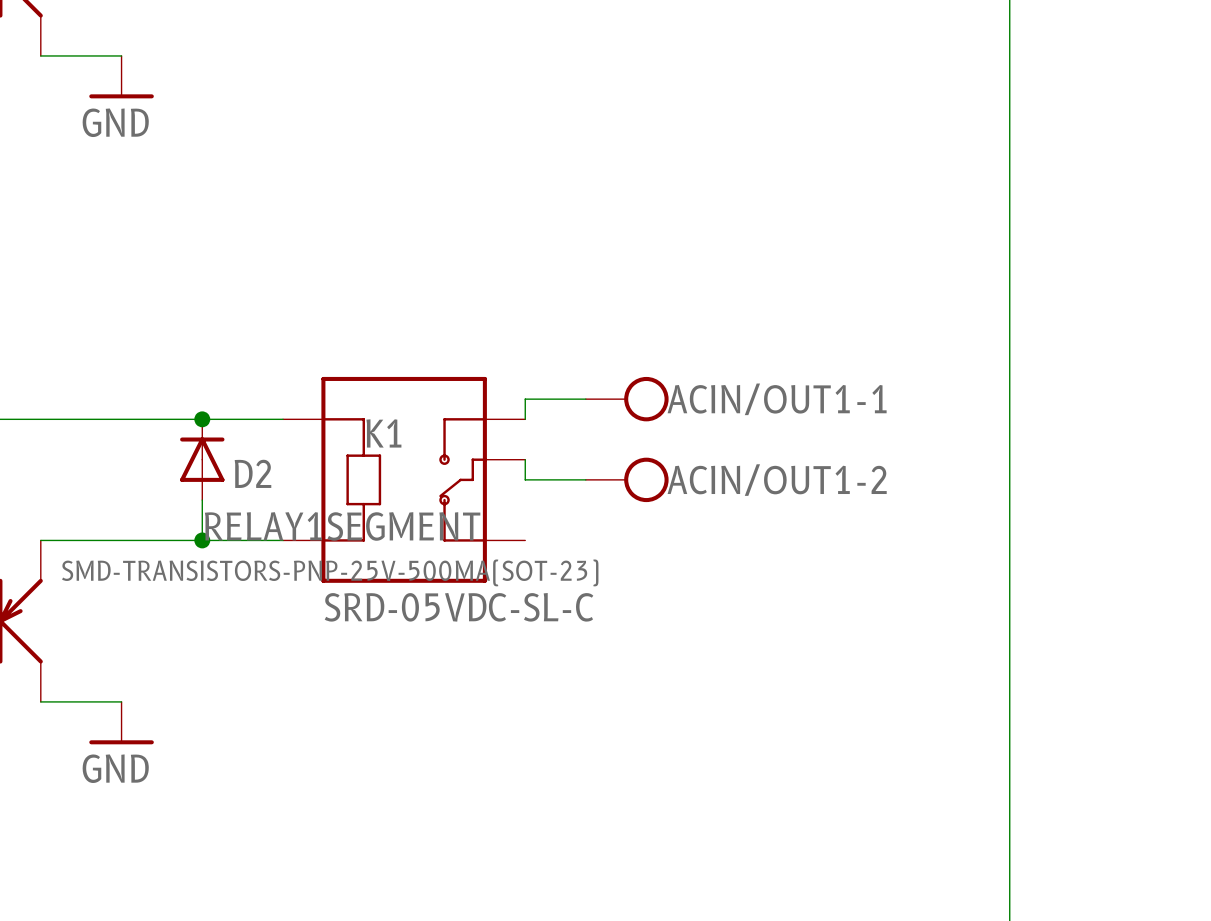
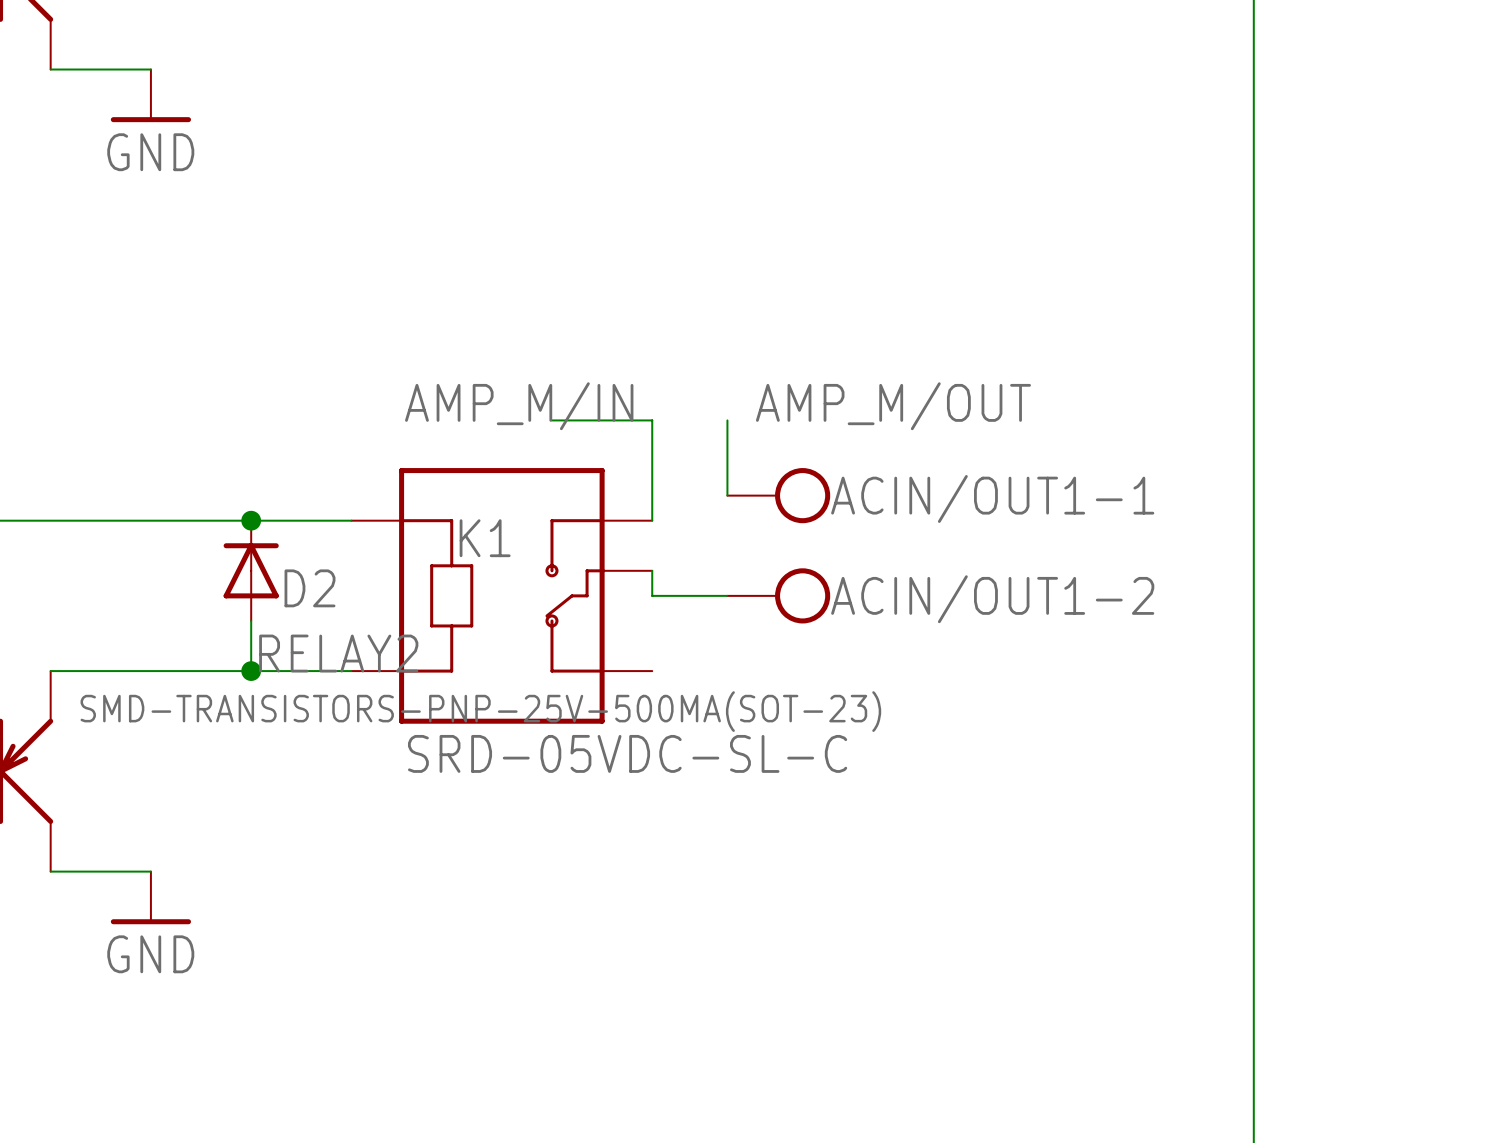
label: none -> AMP_M/IN (519, 406)
label: none -> AMP_M/OUT (893, 406)
wire: none -> (551, 420) (652, 420) (652, 495)
wire: (525, 399) (585, 399) -> (727, 420) (727, 495)
label: RELAY1SEGMENT (342, 526) -> RELAY2 (338, 653)

